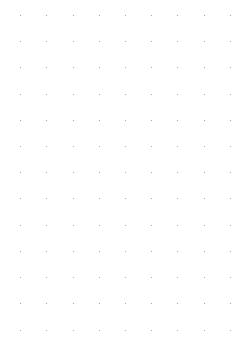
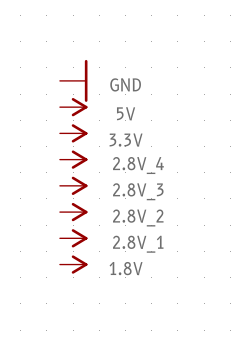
power symbol: none -> GND (73, 80)
power symbol: none -> 5V (73, 107)
power symbol: none -> 3.3V (73, 133)
power symbol: none -> 2.8V_4 (73, 159)
power symbol: none -> 2.8V_3 (73, 185)
power symbol: none -> 2.8V_2 (73, 212)
power symbol: none -> 2.8V_1 (73, 238)
power symbol: none -> 1.8V (73, 264)

